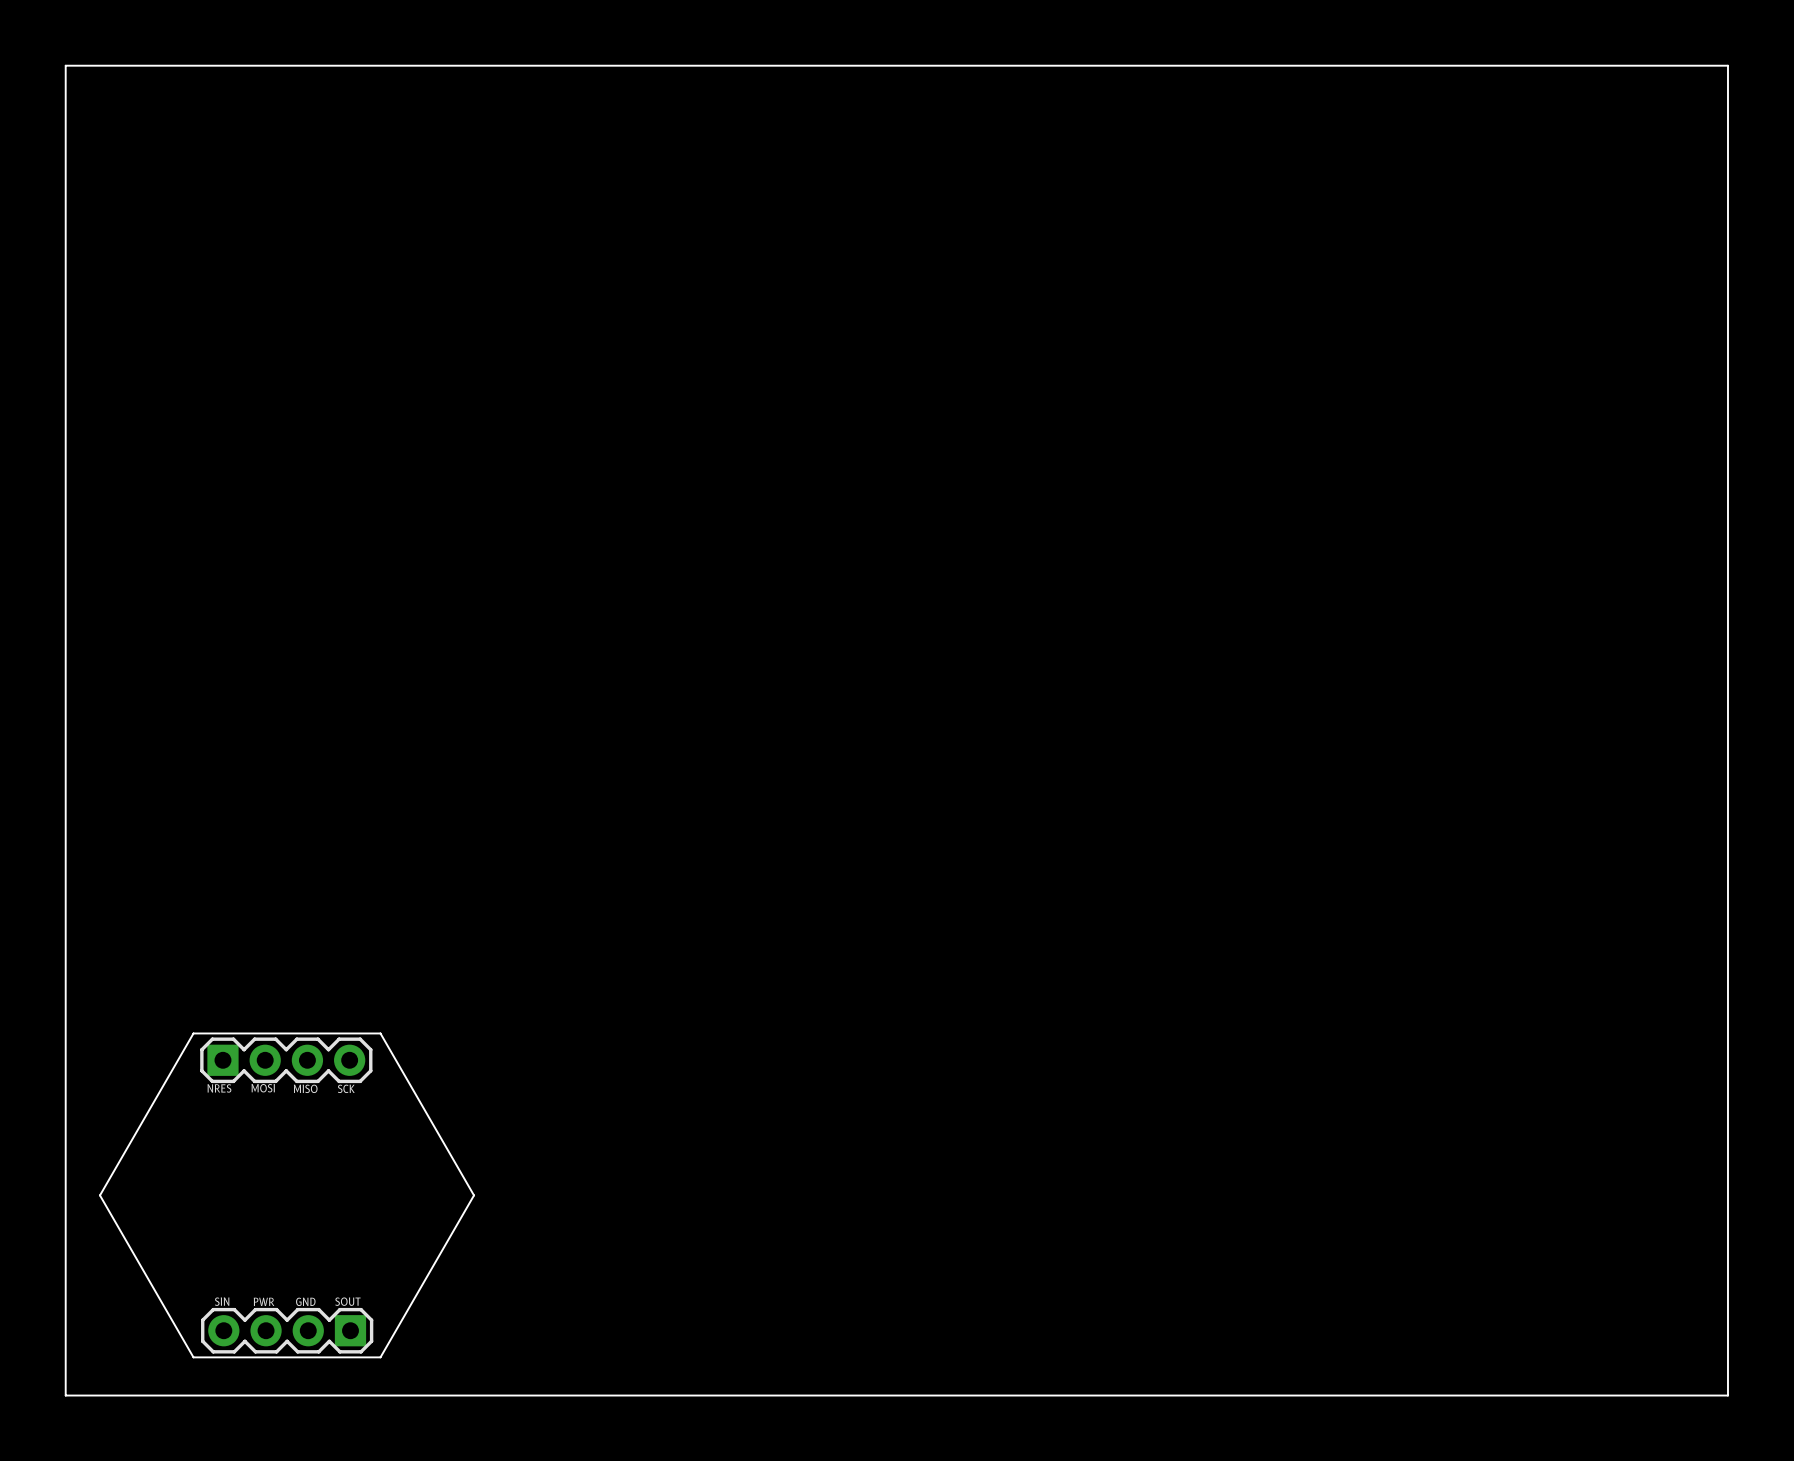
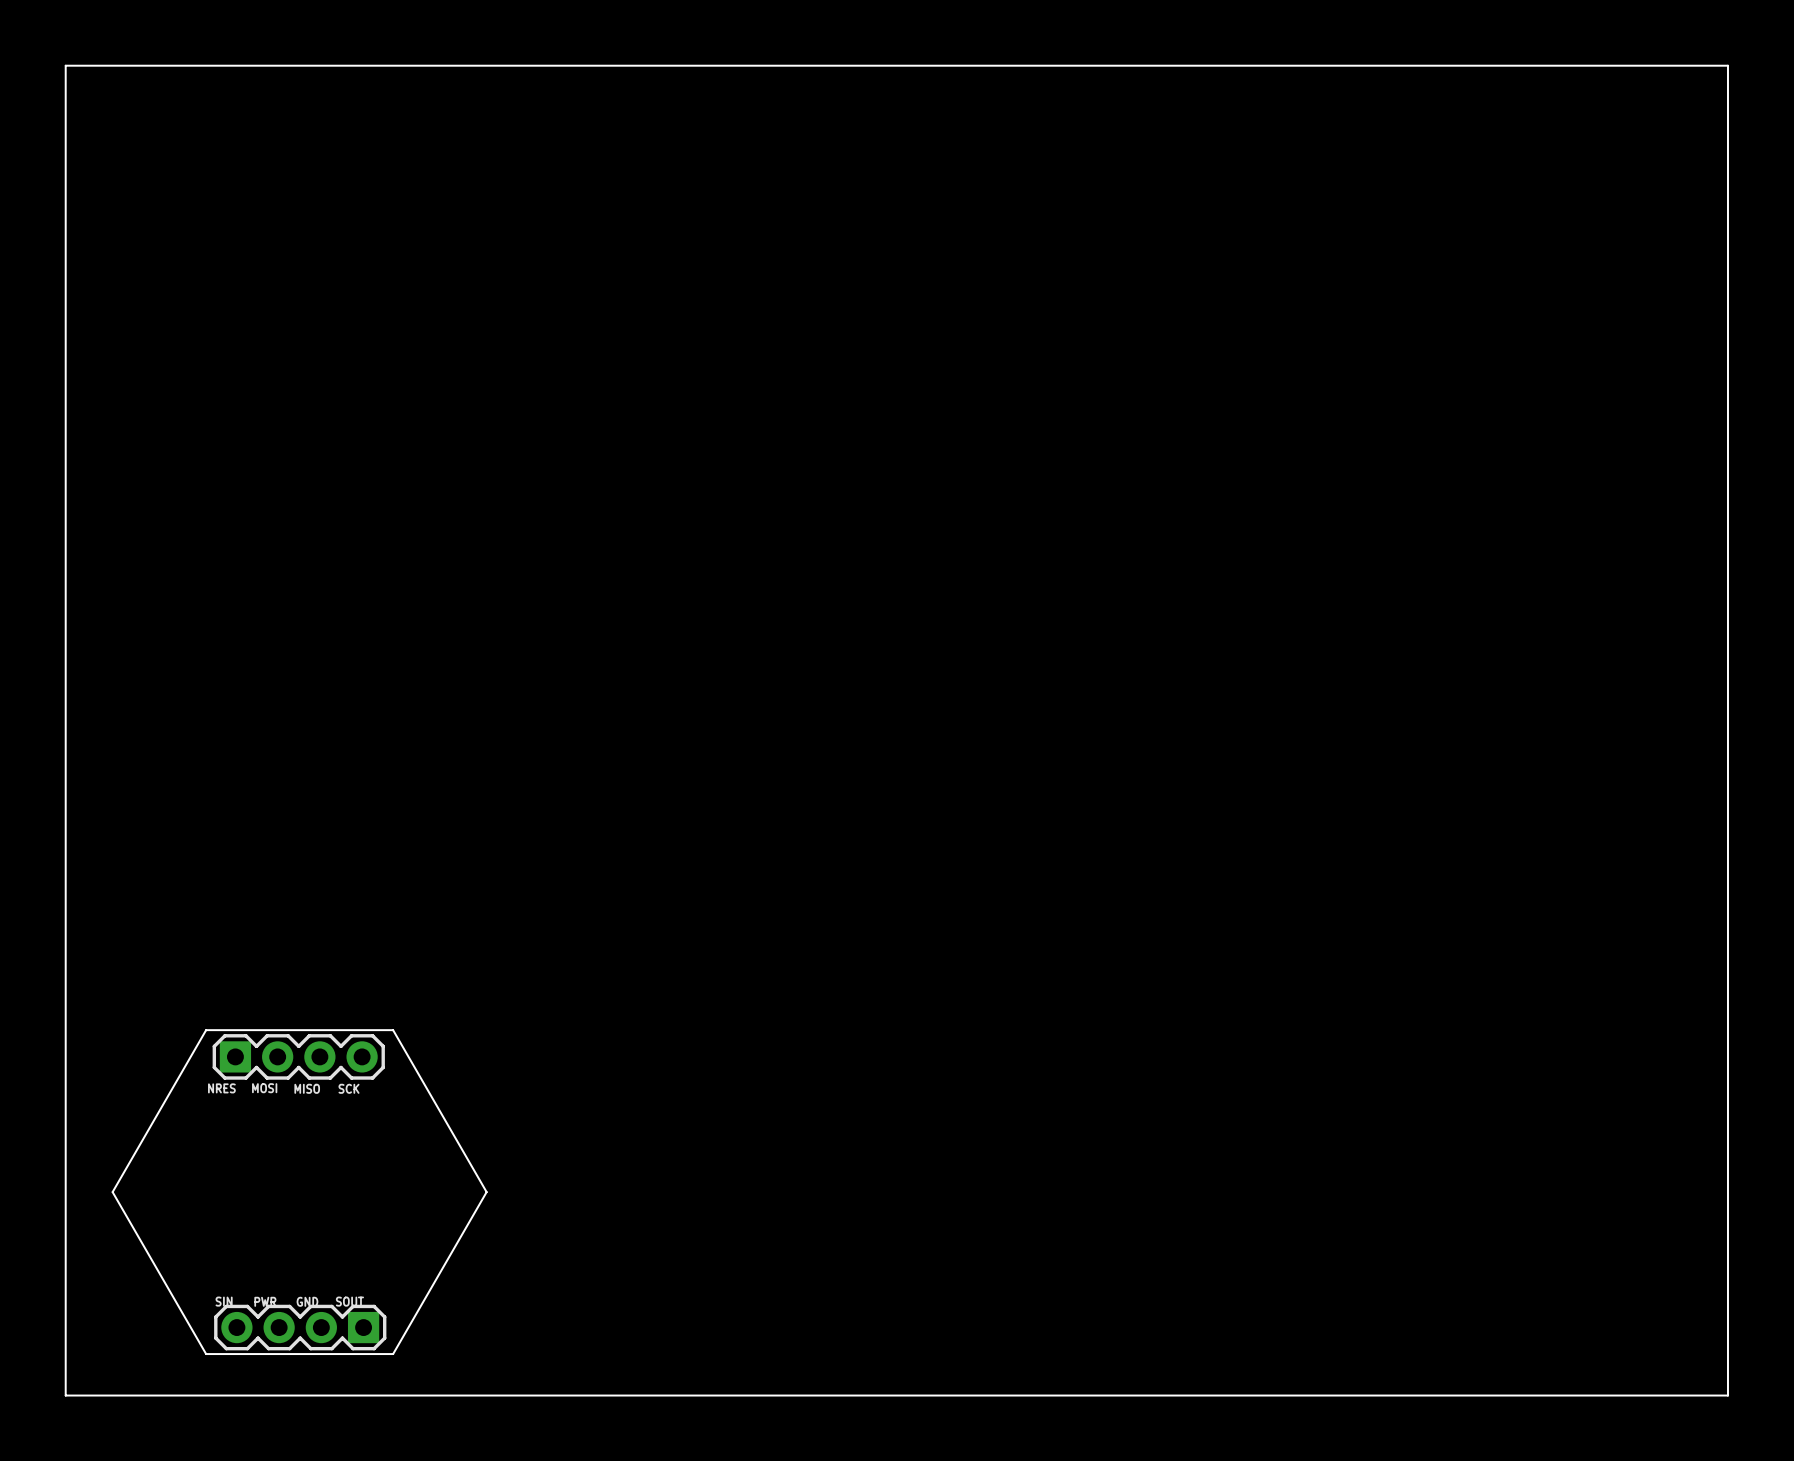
board edge: (193, 1033) (380, 1033) (474, 1195) (380, 1357) (193, 1357) (99, 1195) (193, 1033) -> (206, 1030) (393, 1030) (486, 1192) (393, 1354) (206, 1354) (112, 1192) (206, 1030)
part position: (286, 1060) -> (298, 1056)
part position: (287, 1330) -> (300, 1327)

